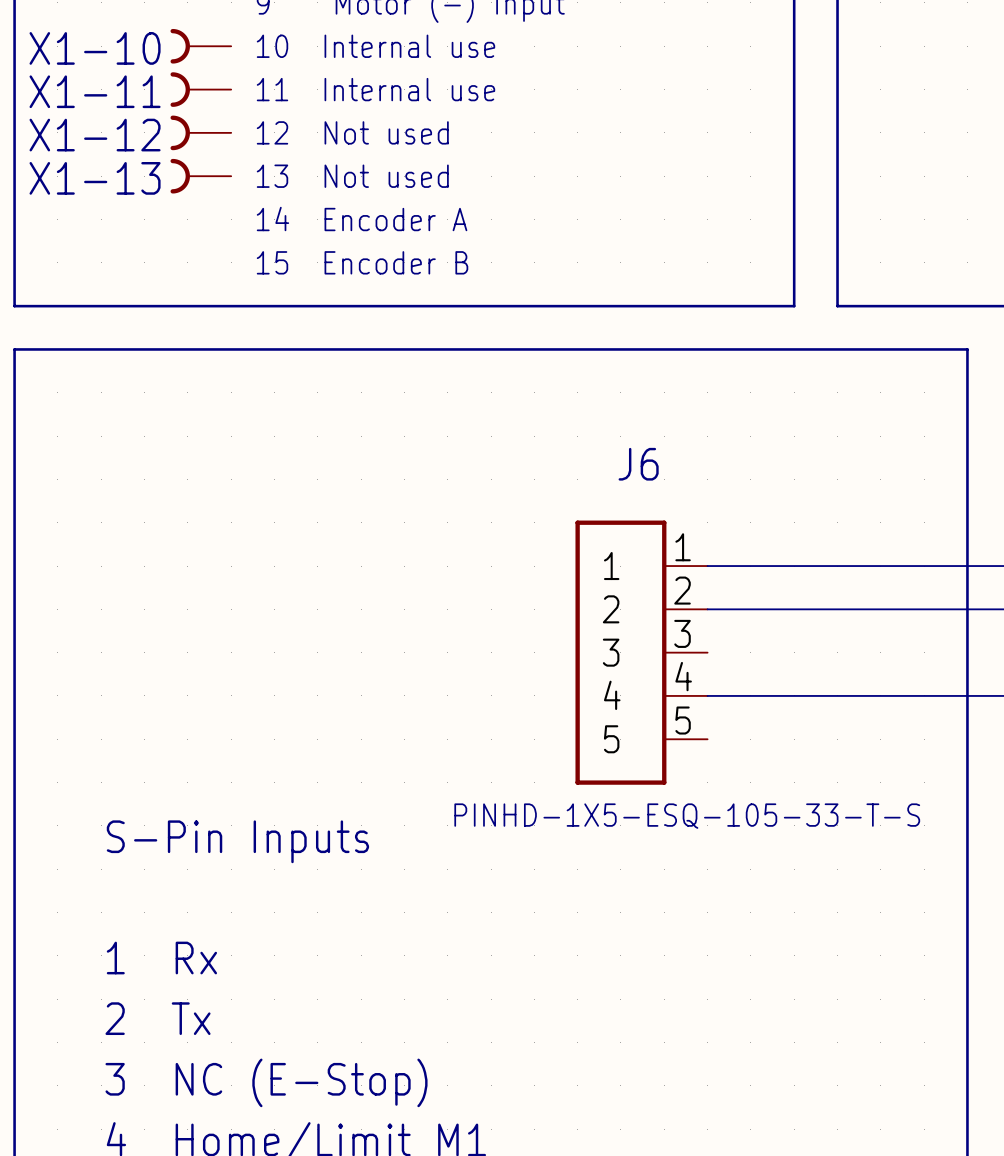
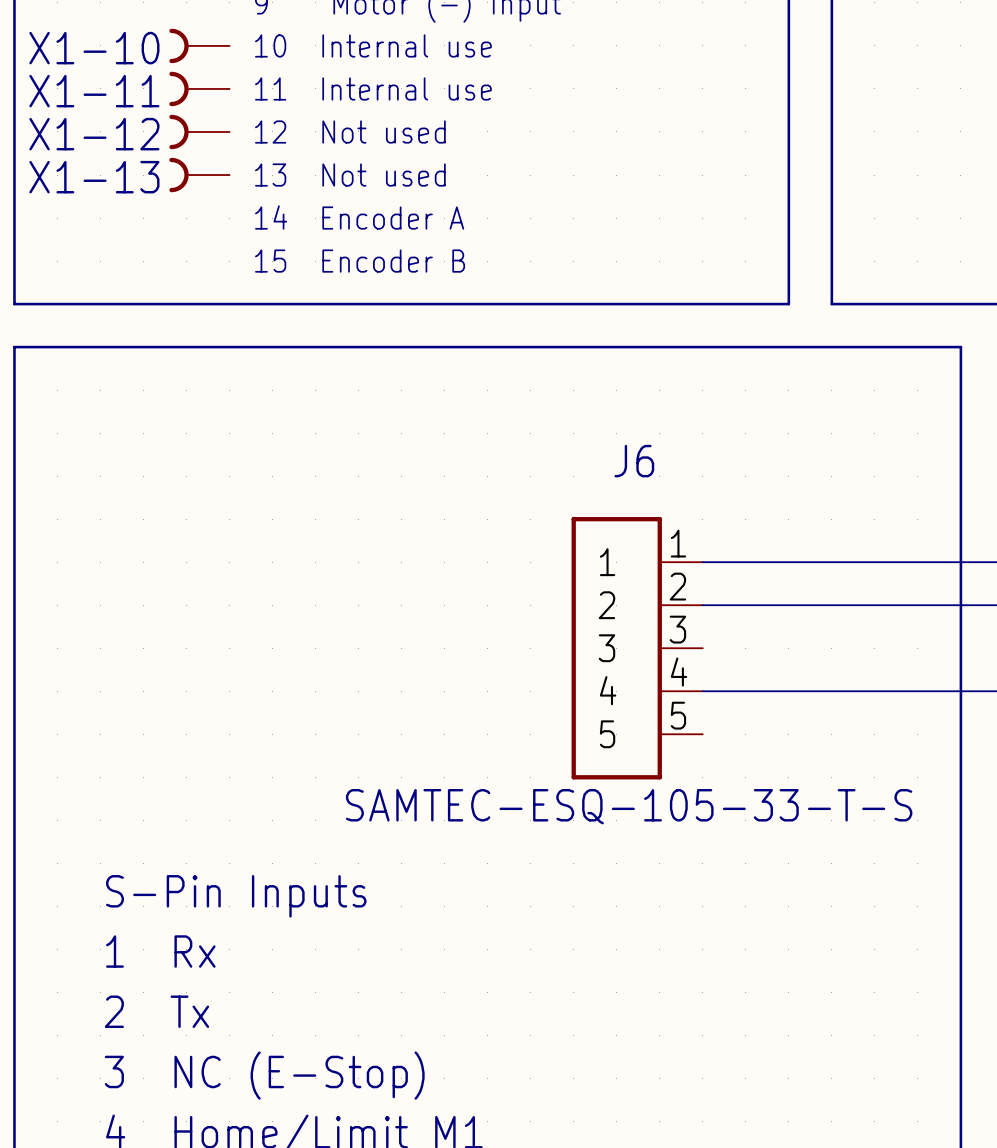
J6 value: PINHD-1X5-ESQ-105-33-T-S (687, 816) -> SAMTEC-ESQ-105-33-T-S (629, 806)
text position: S-Pin Inputs (237, 841) -> S-Pin Inputs (236, 896)

